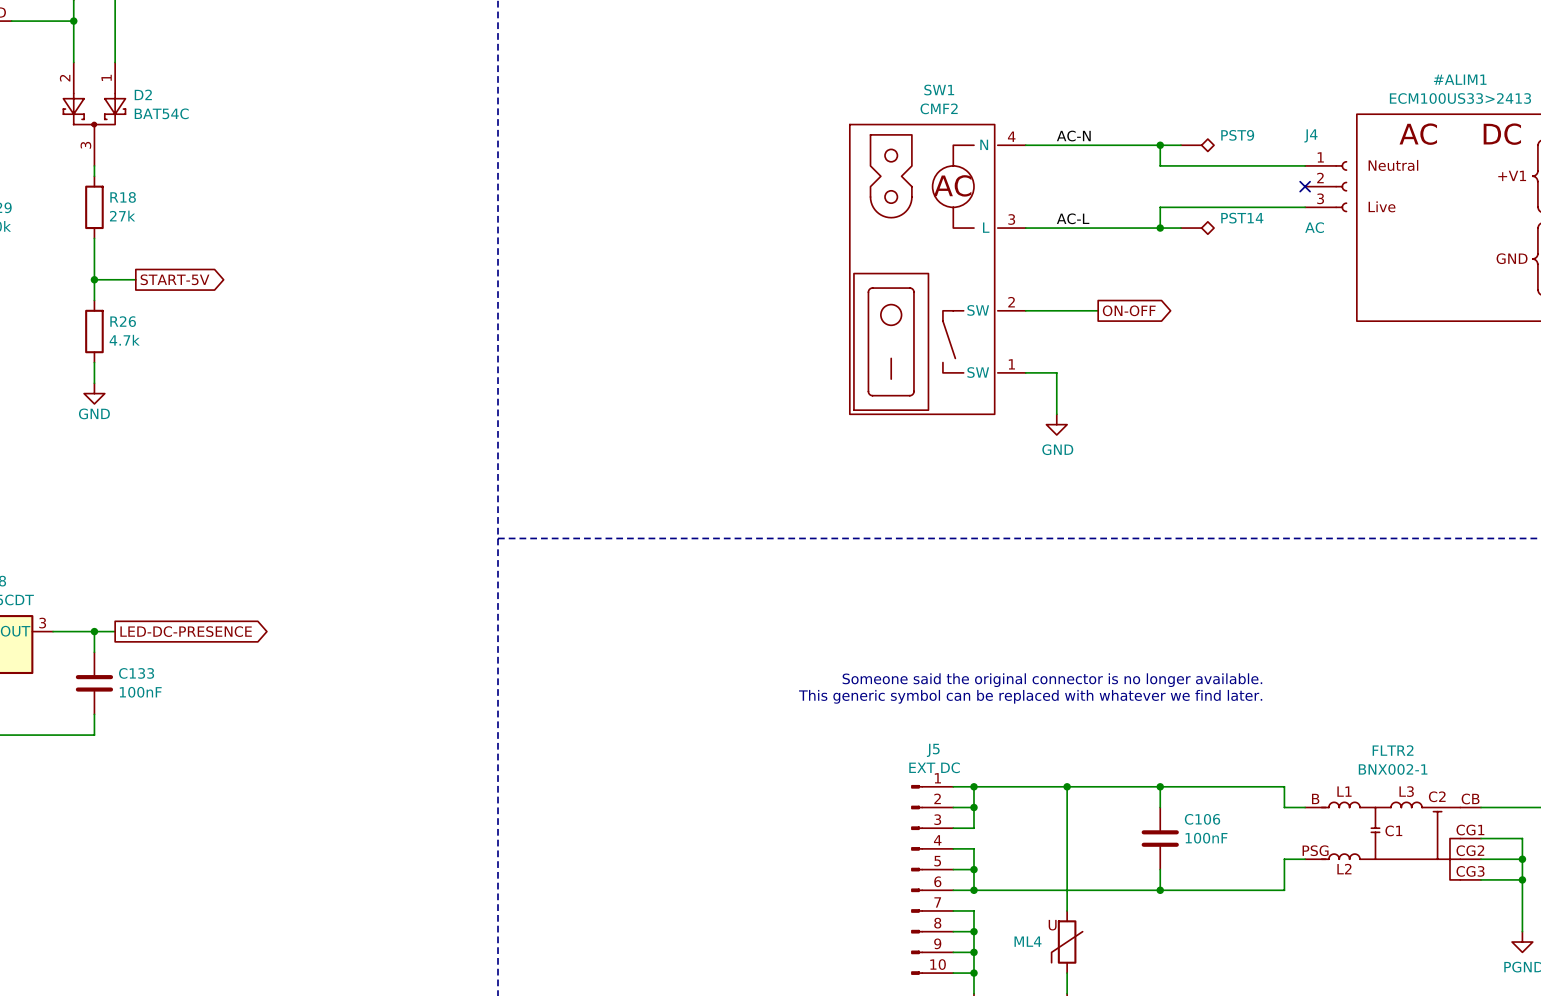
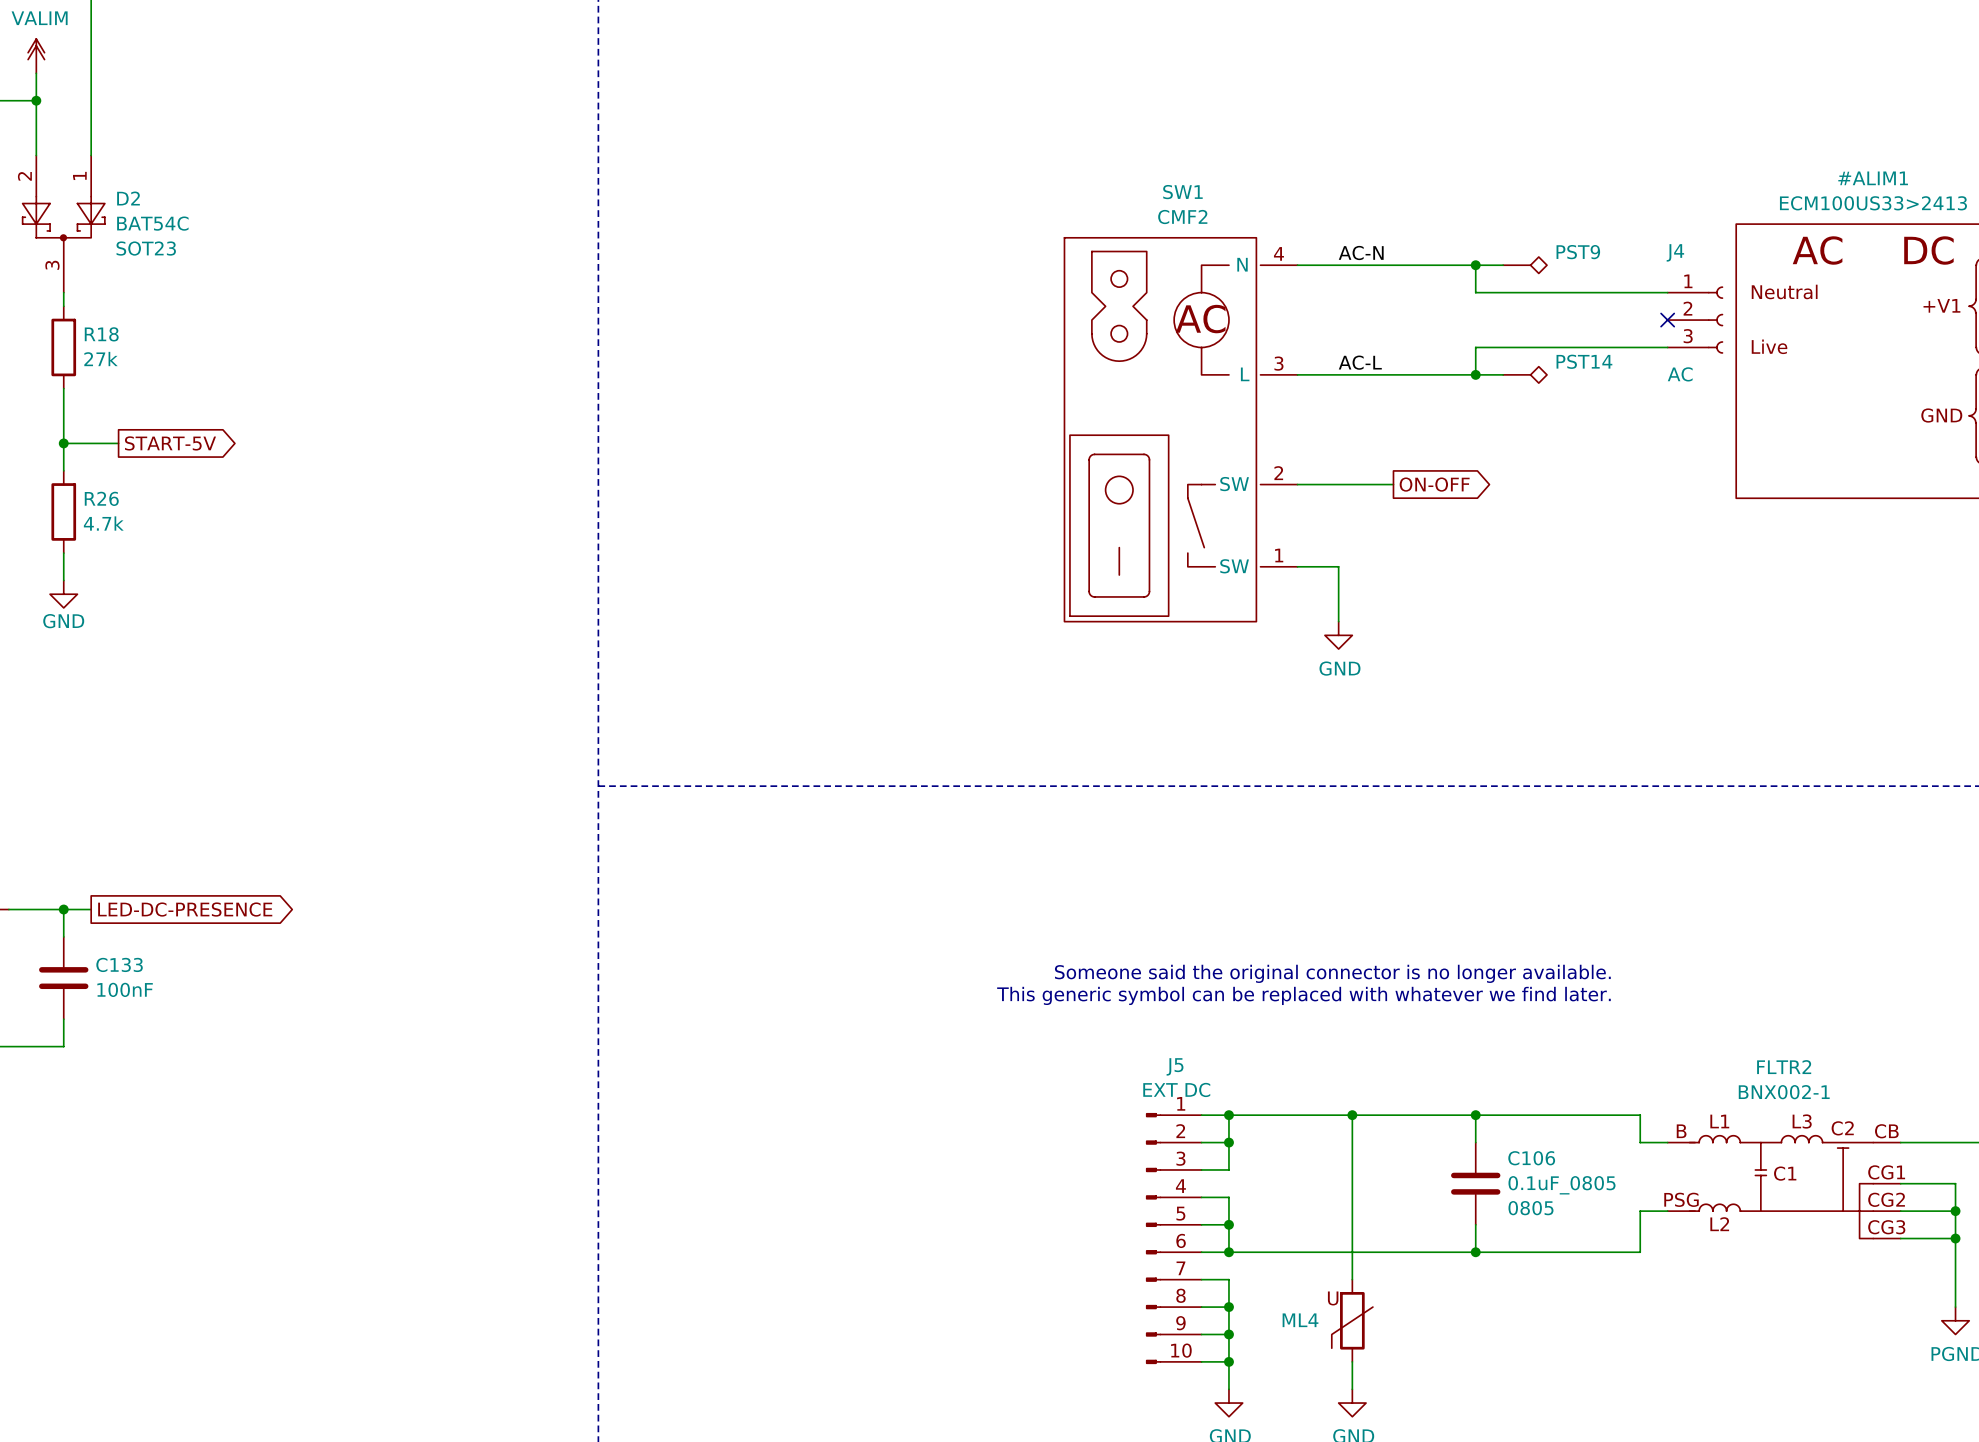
D2 text: none -> SOT23 (146, 248)
C106 value: 100nF (1206, 838) -> 0.1uF_0805 (1562, 1185)
C106 text: none -> 0805 (1530, 1208)

